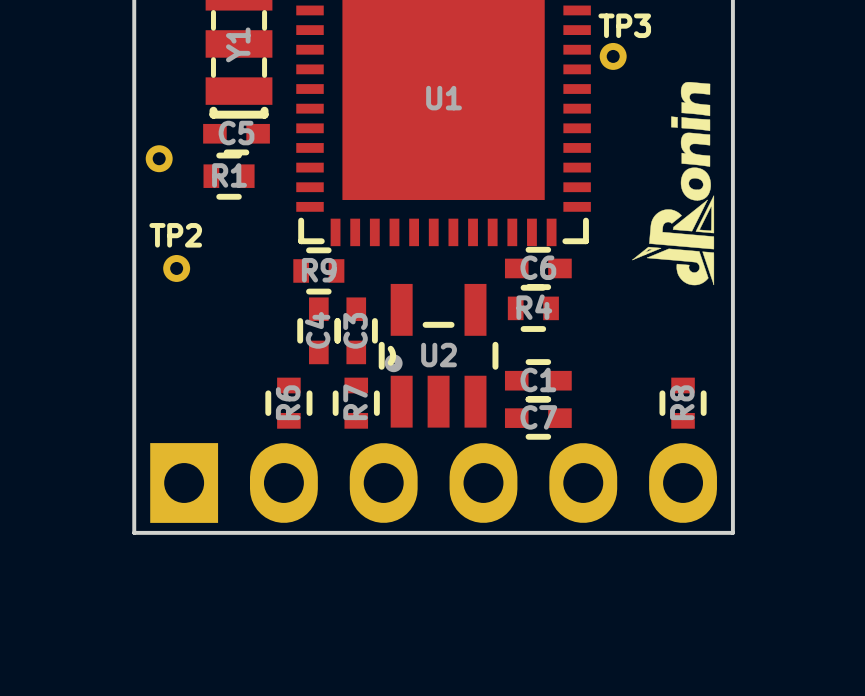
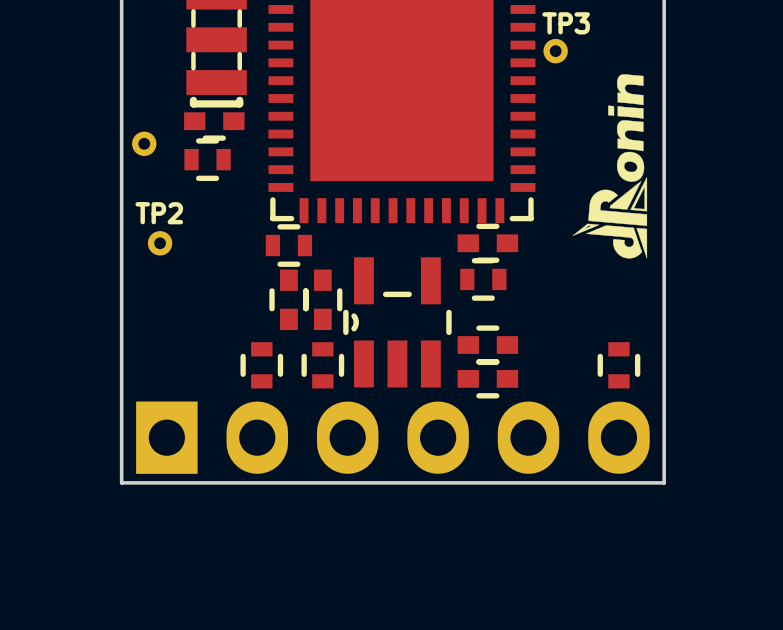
Y1 name: Y1 (238, 44) -> none
U1 name: U1 (444, 98) -> none
C5 name: C5 (236, 133) -> none
R1 name: R1 (229, 175) -> none
C6 name: C6 (538, 267) -> none
R9 name: R9 (319, 270) -> none
R4 name: R4 (534, 307) -> none
C4 name: C4 (317, 330) -> none
C3 name: C3 (355, 330) -> none
drawing: [384, 354, 403, 373] -> none
U2 name: U2 (439, 355) -> none
C1 name: C1 (538, 379) -> none
R6 name: R6 (288, 402) -> none
R7 name: R7 (355, 402) -> none
R8 name: R8 (682, 402) -> none
C7 name: C7 (538, 417) -> none

